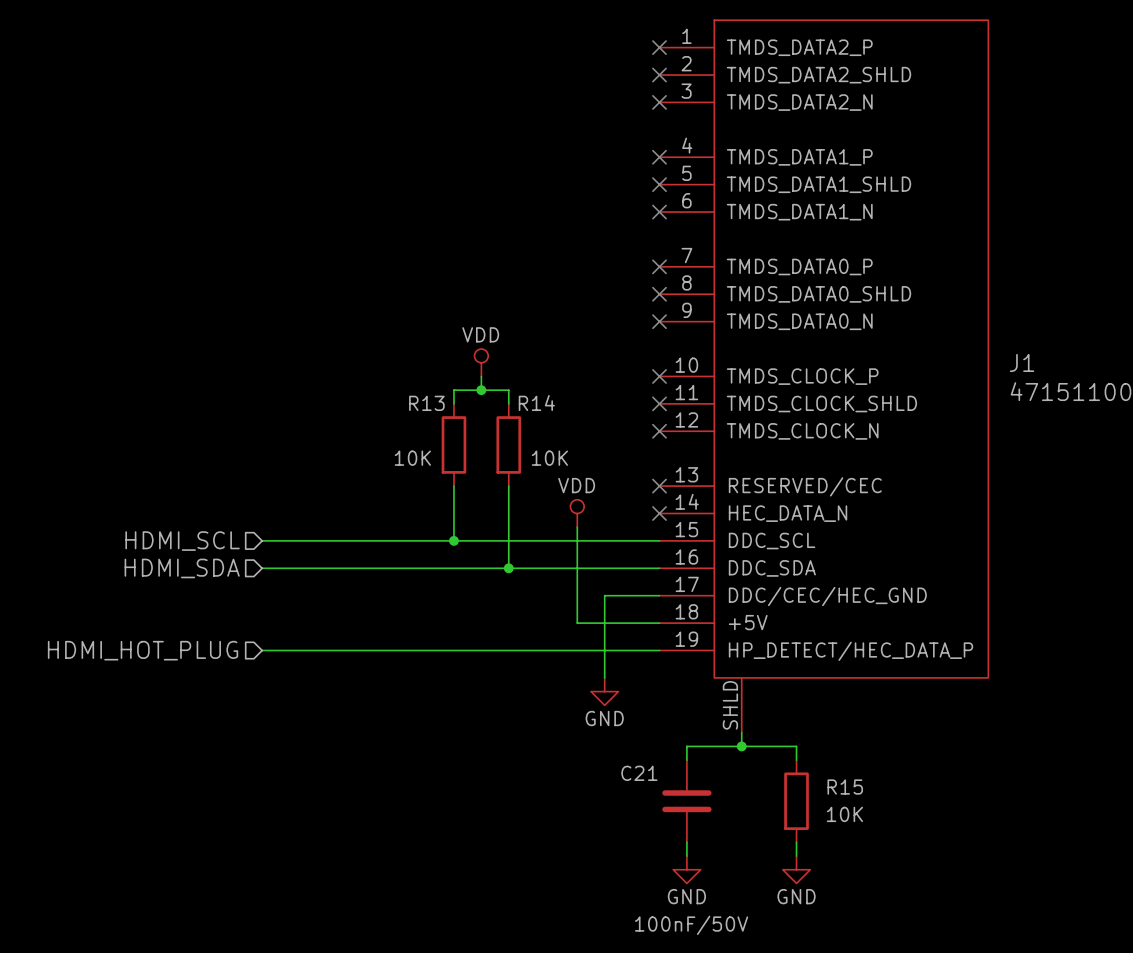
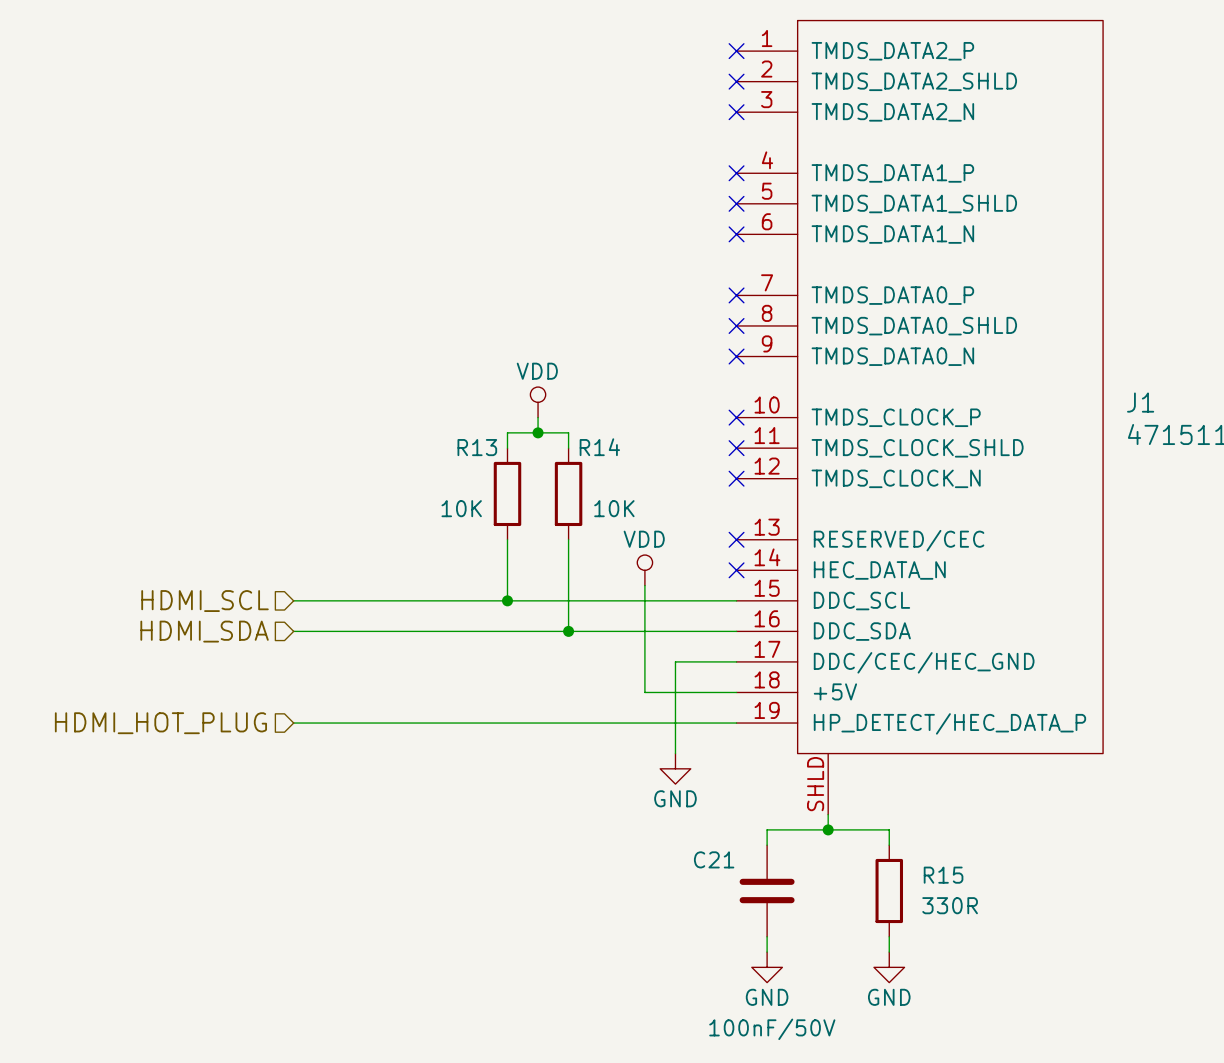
R15 value: 10K (844, 814) -> 330R (950, 905)

